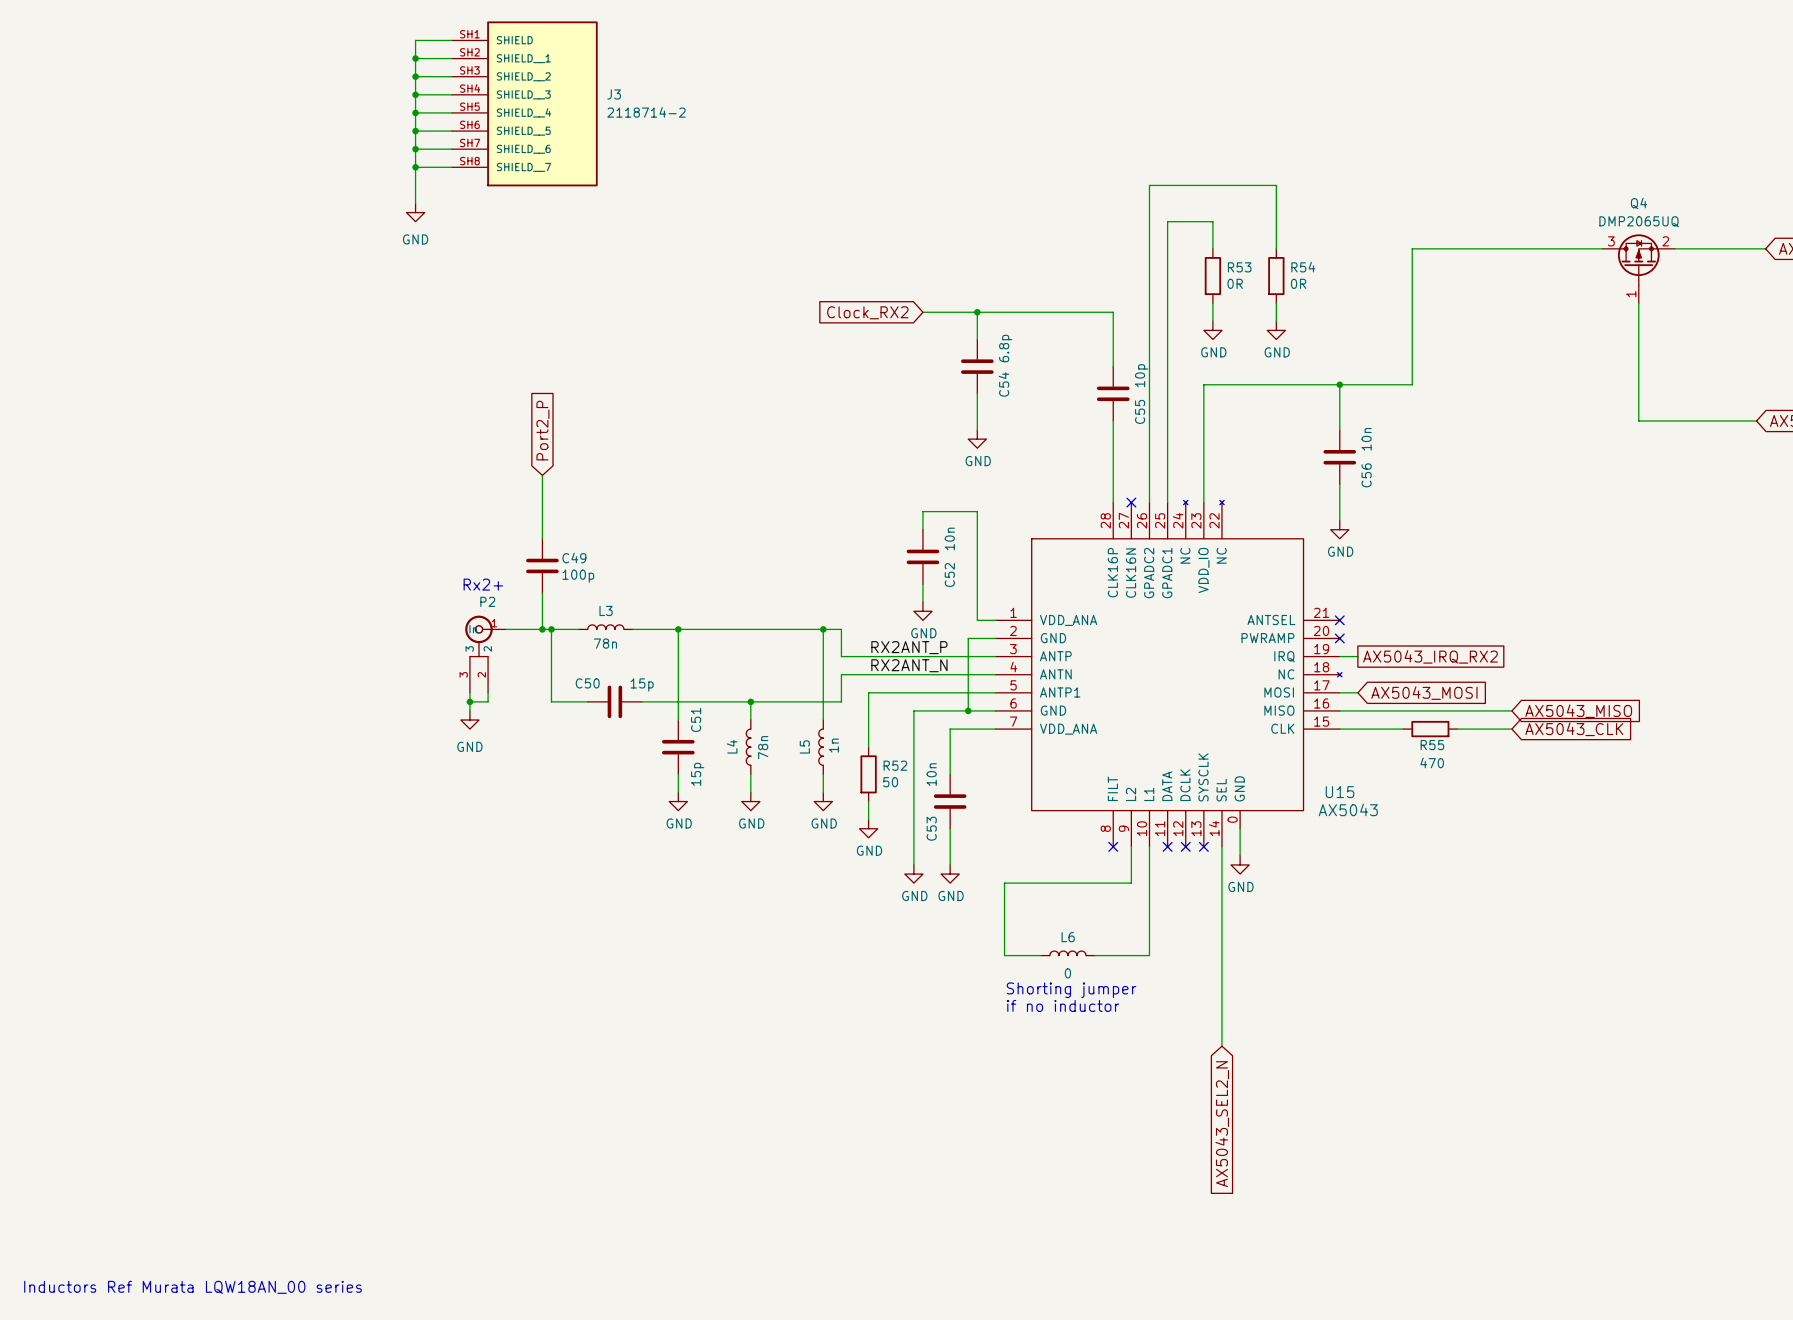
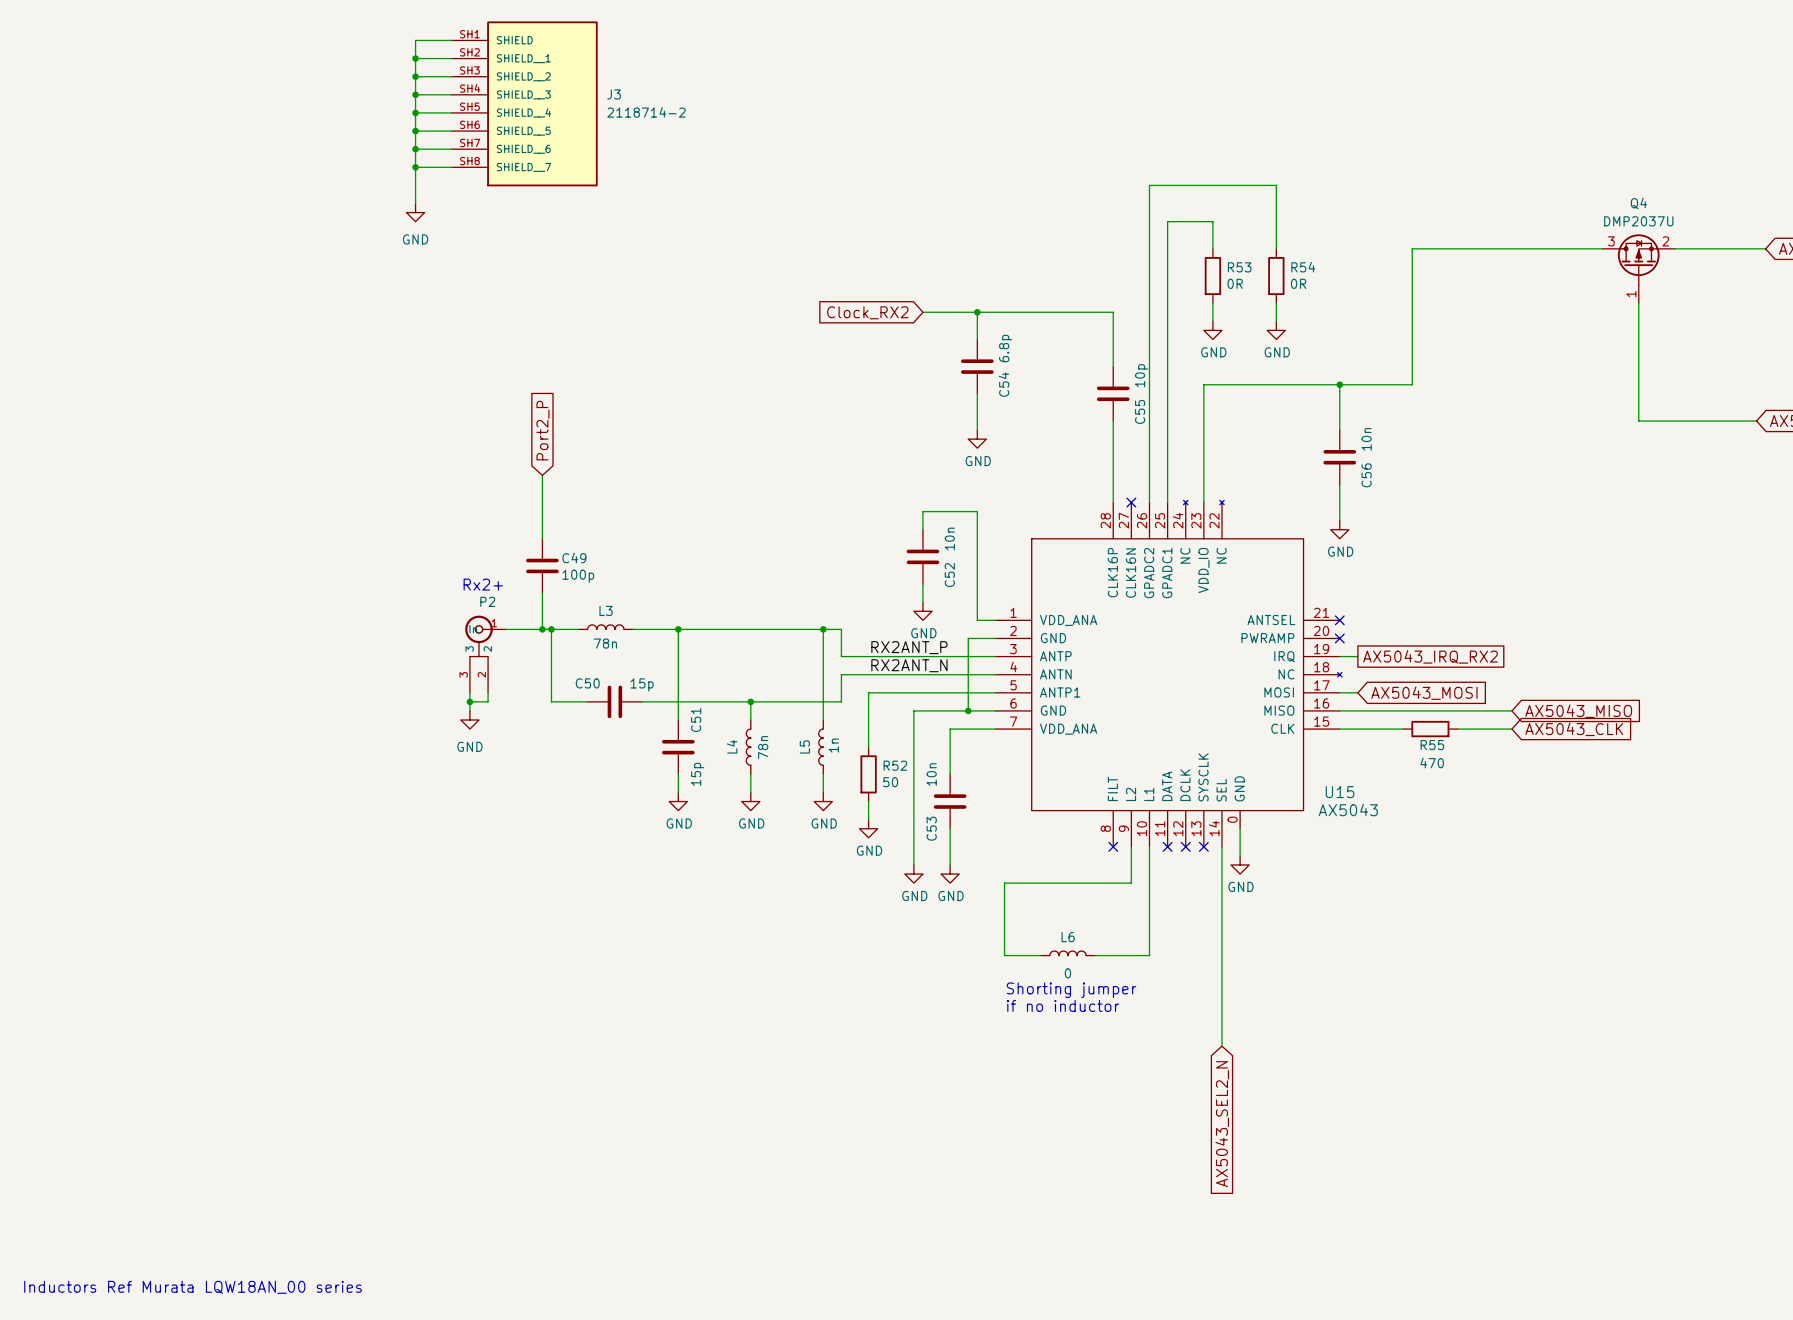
Q4 value: DMP2065UQ (1639, 221) -> DMP2037U (1638, 221)

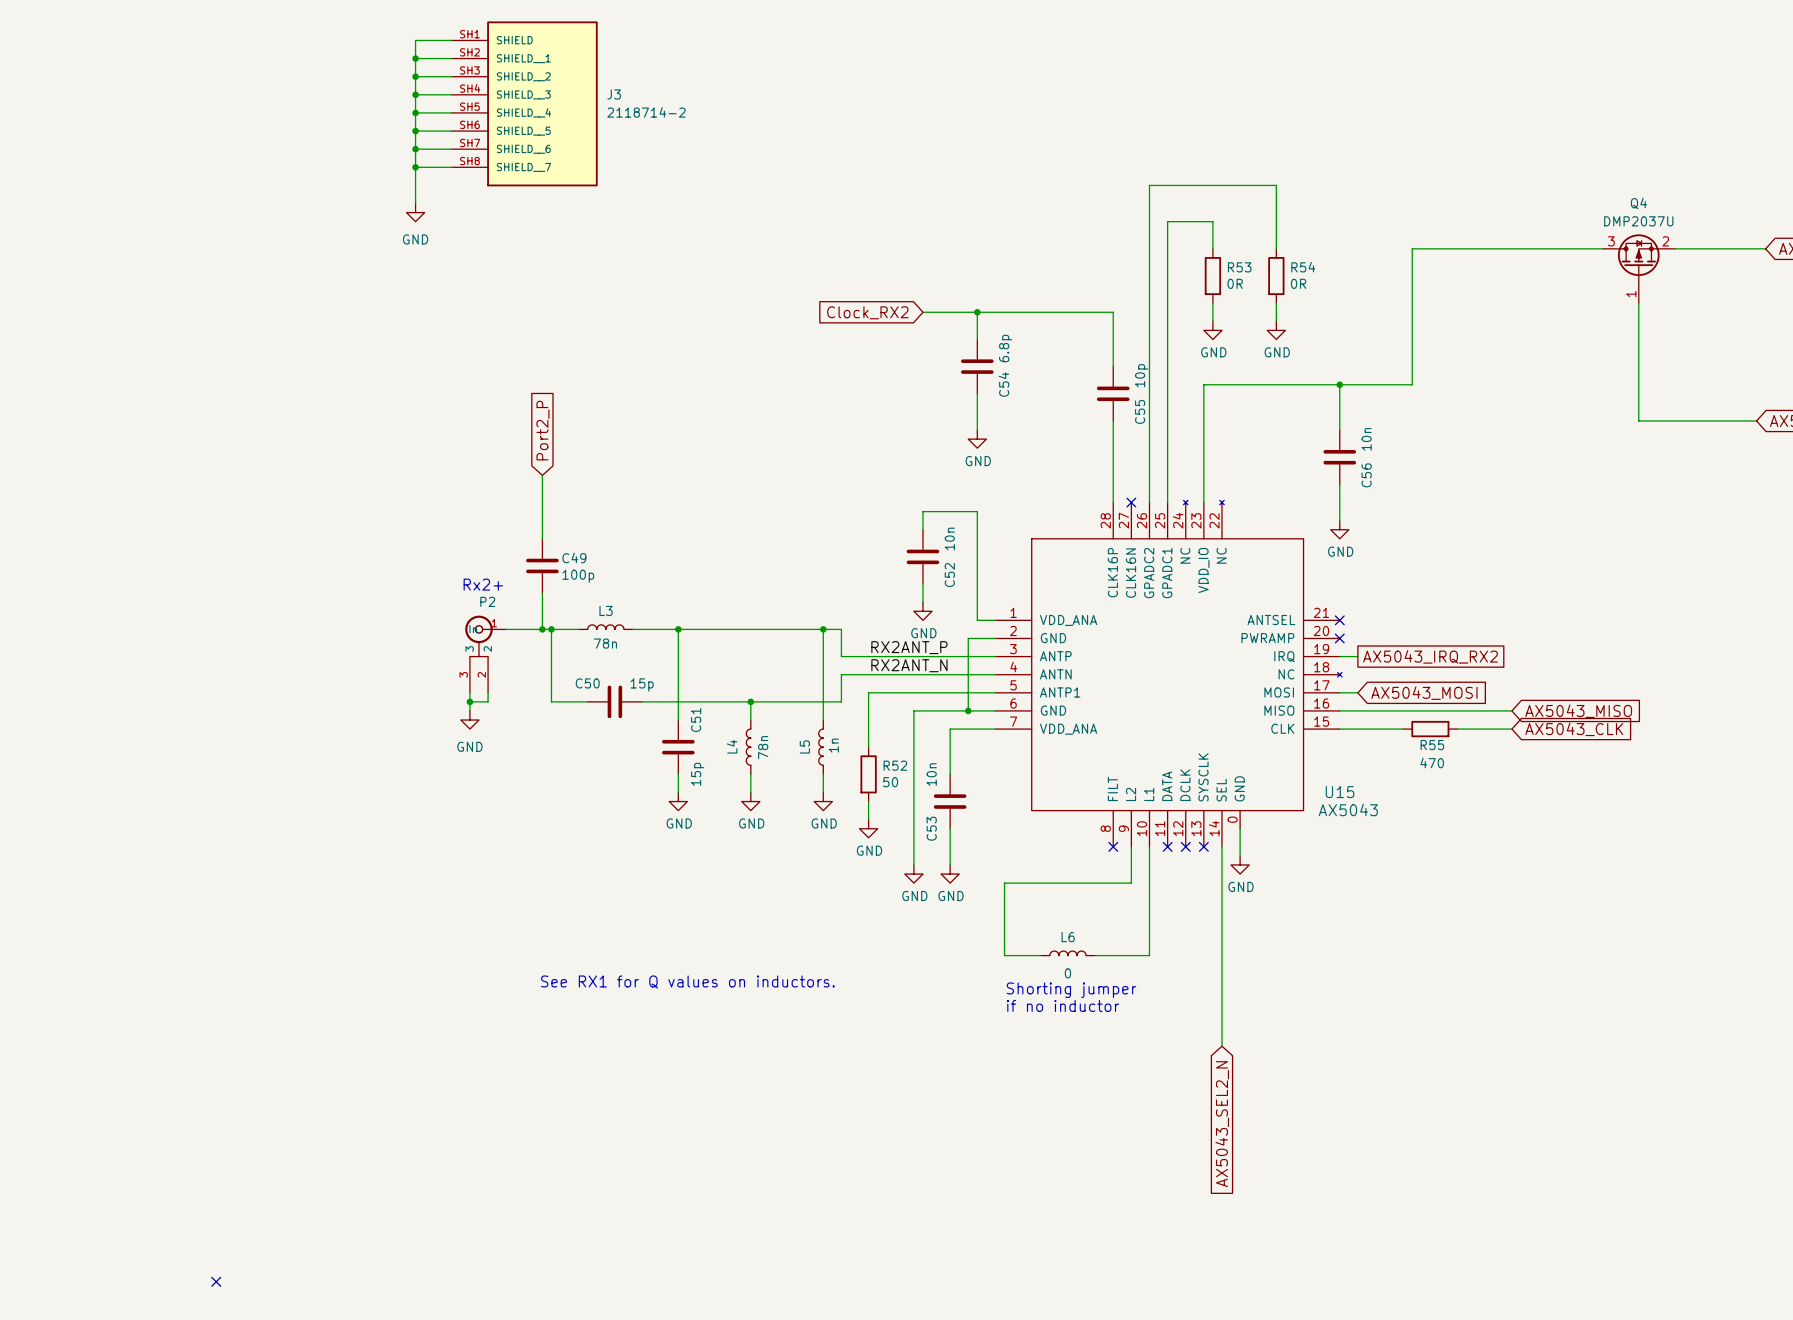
text: none -> See RX1 for Q values on inductors. (687, 981)
no-connect mark: none -> (216, 1281)
text: Inductors Ref Murata LQW18AN_00 series (193, 1287) -> none

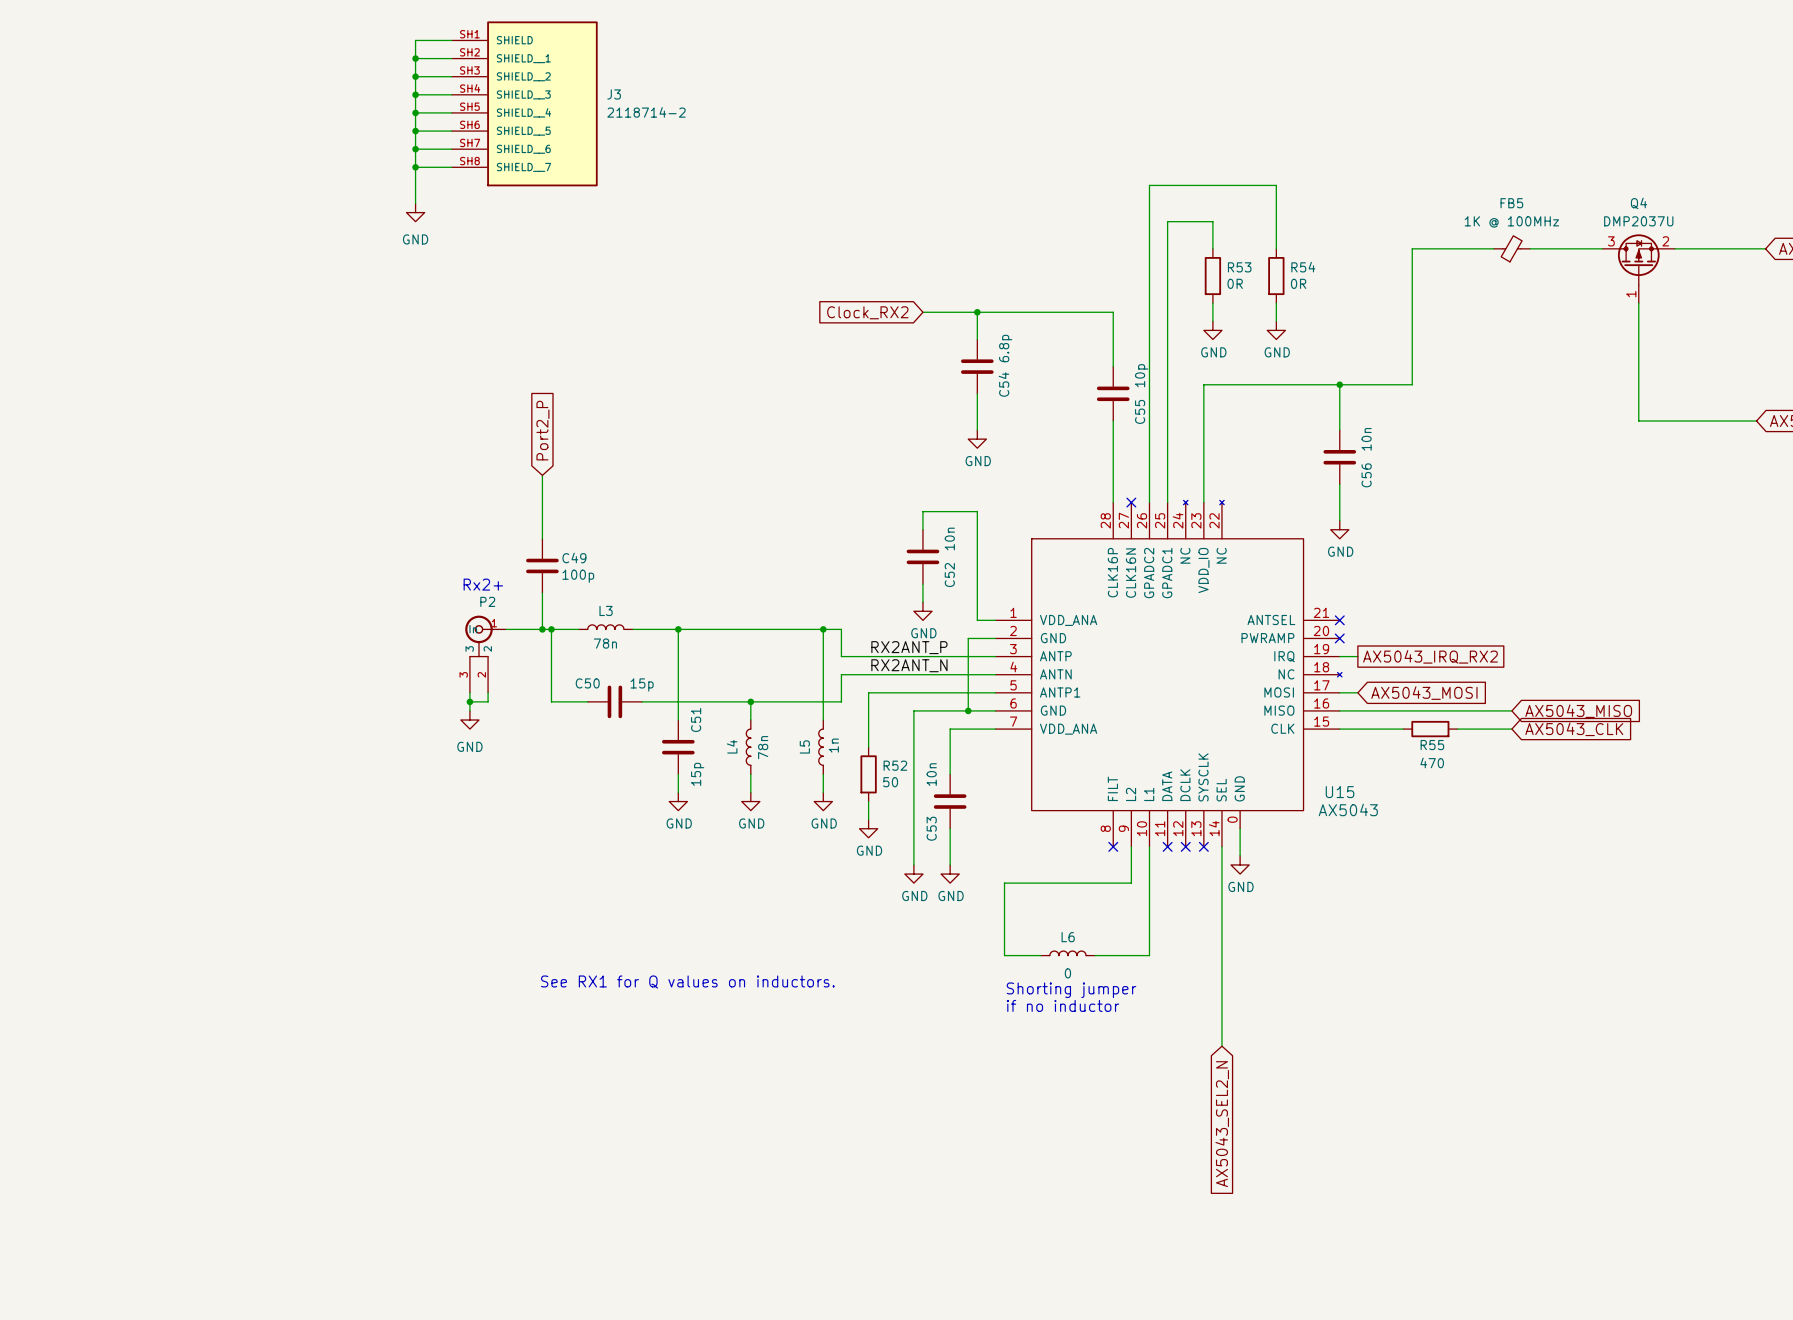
FB5: none -> 1K @ 100MHz (1511, 248)
no-connect mark: (216, 1281) -> none

